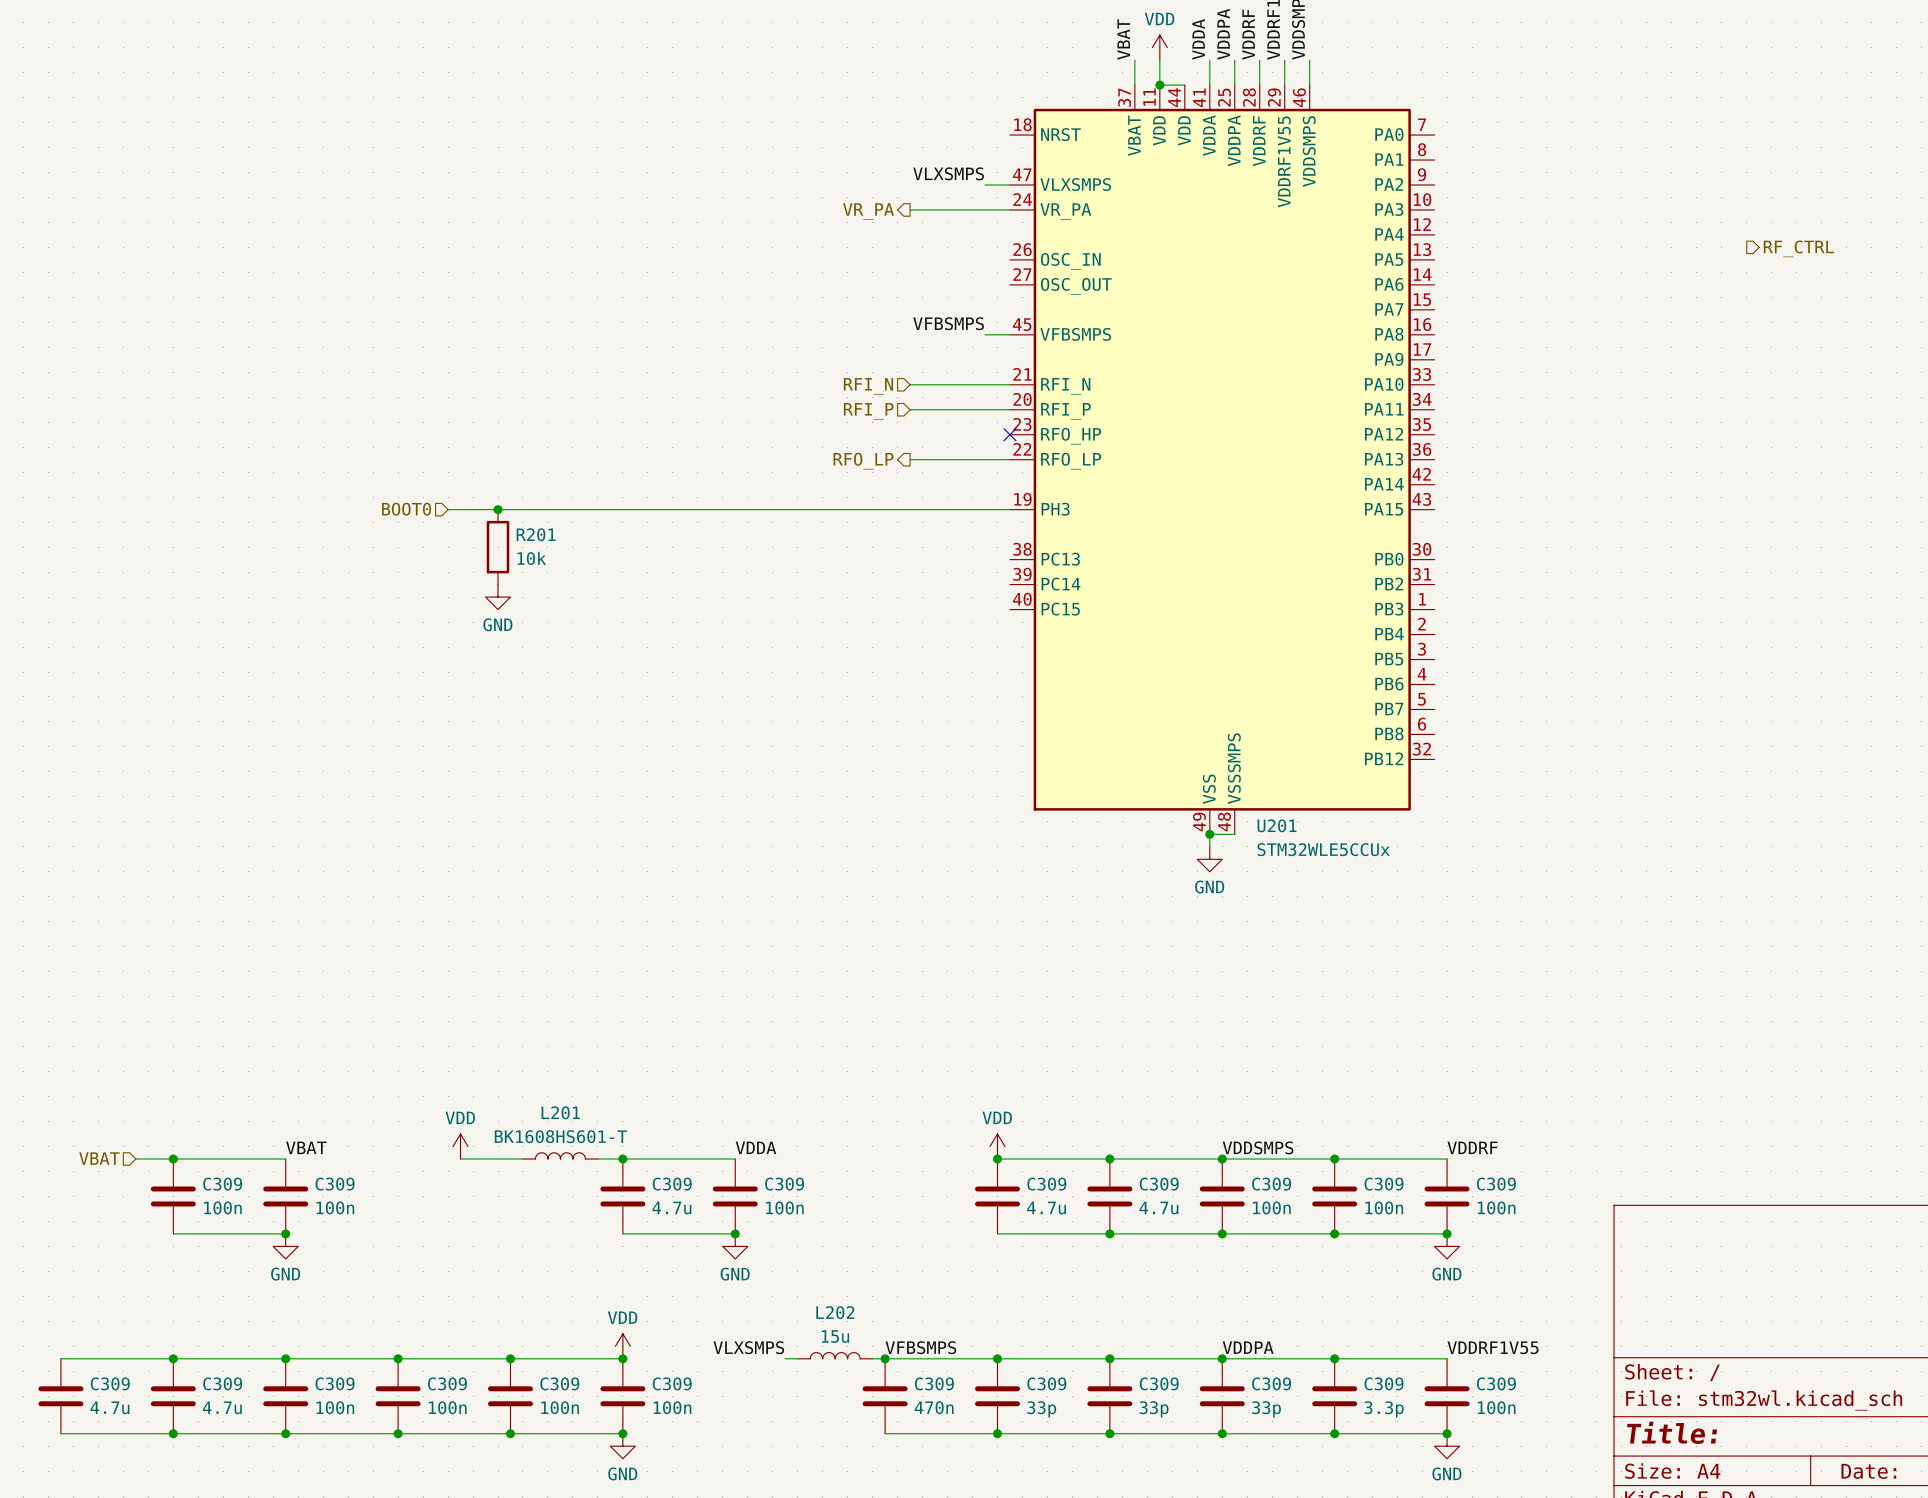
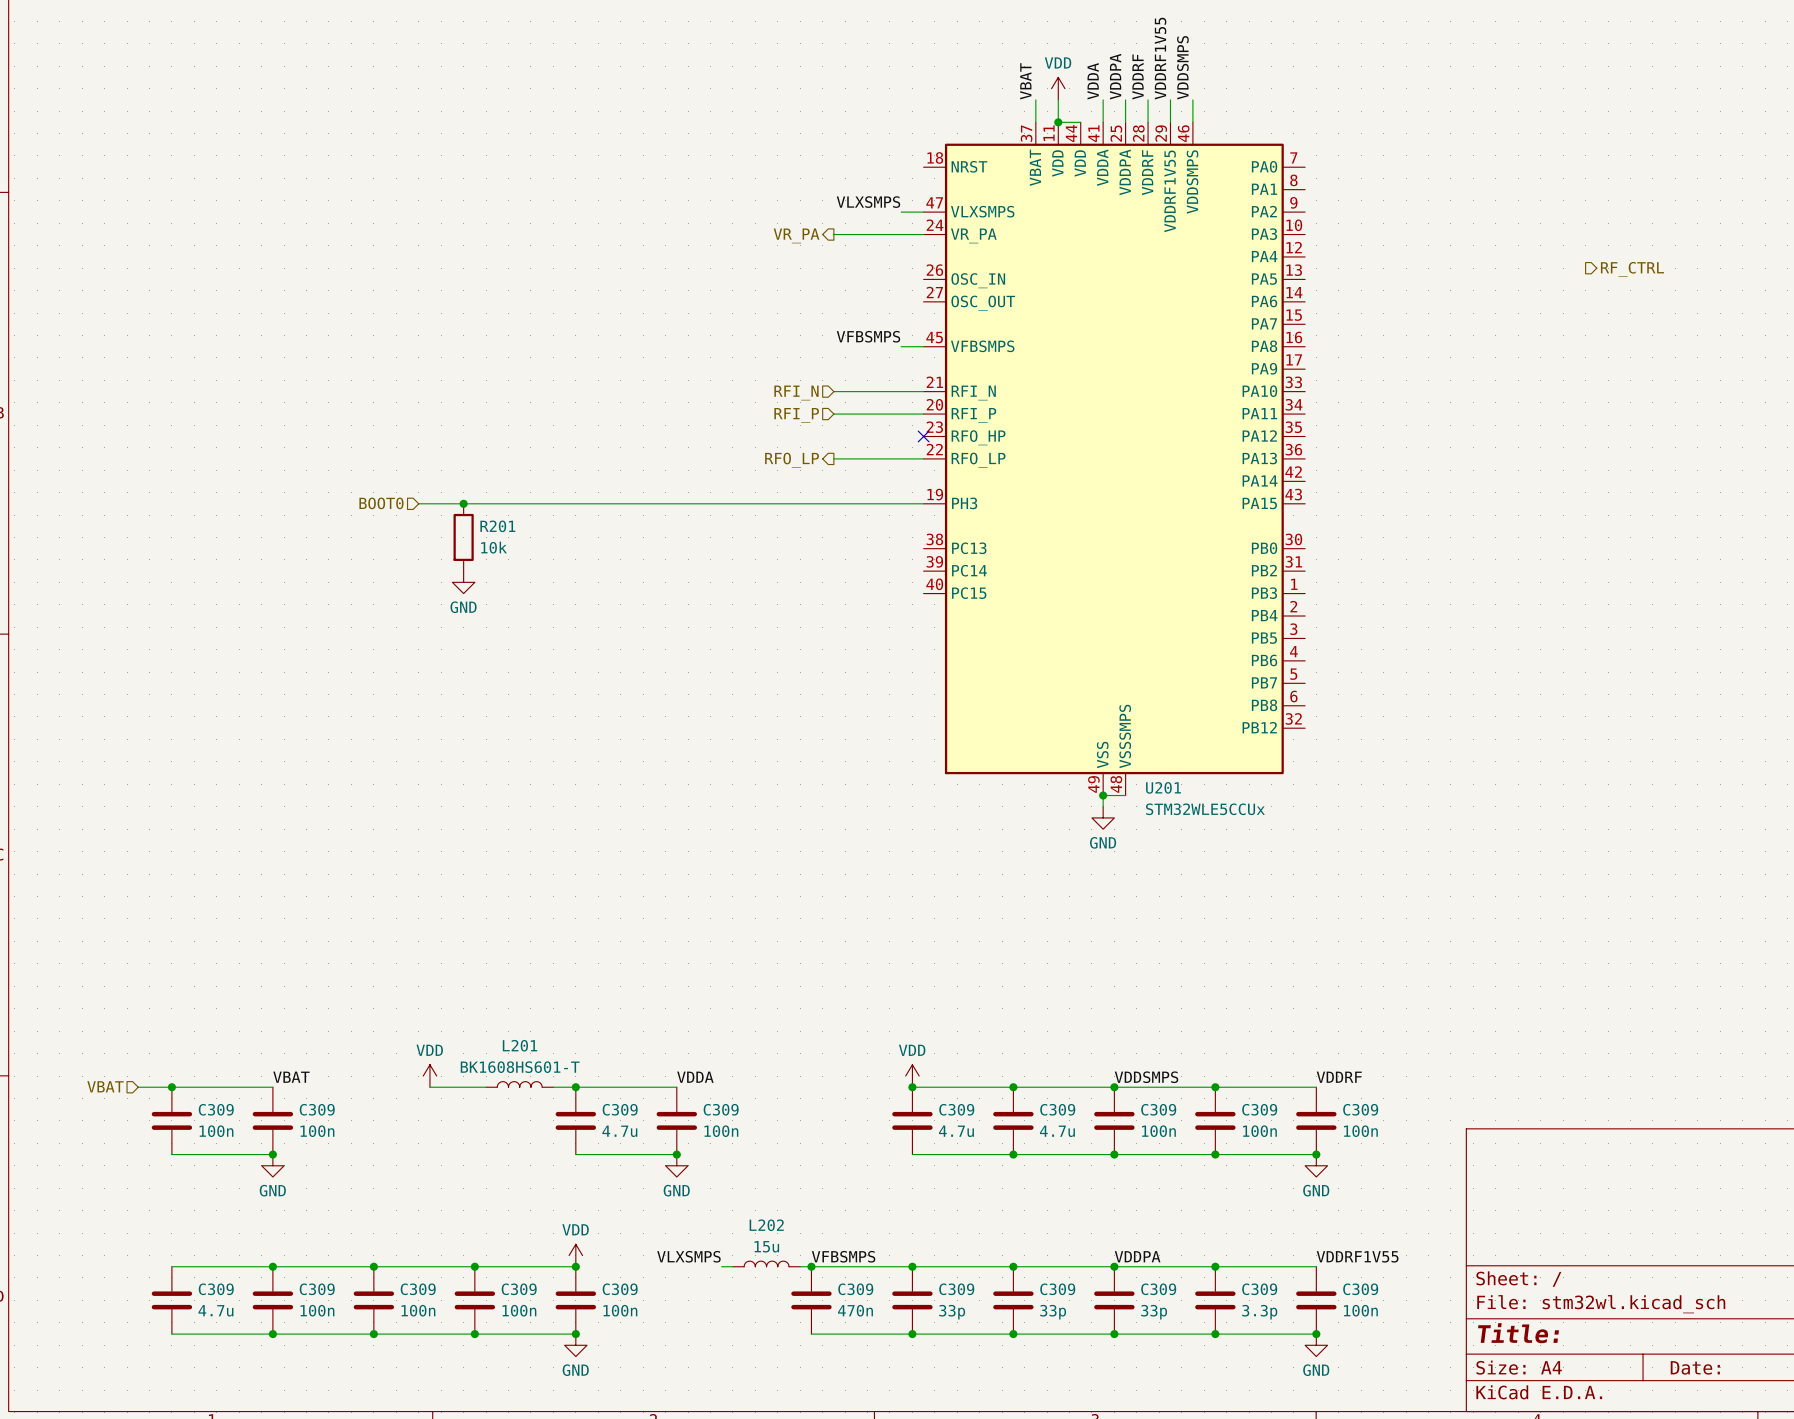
wire: (60, 1358) (173, 1358) -> none
junction: (173, 1358) -> none
C309: 4.7u (60, 1396) -> none
wire: (60, 1433) (173, 1433) -> none
junction: (173, 1433) -> none

